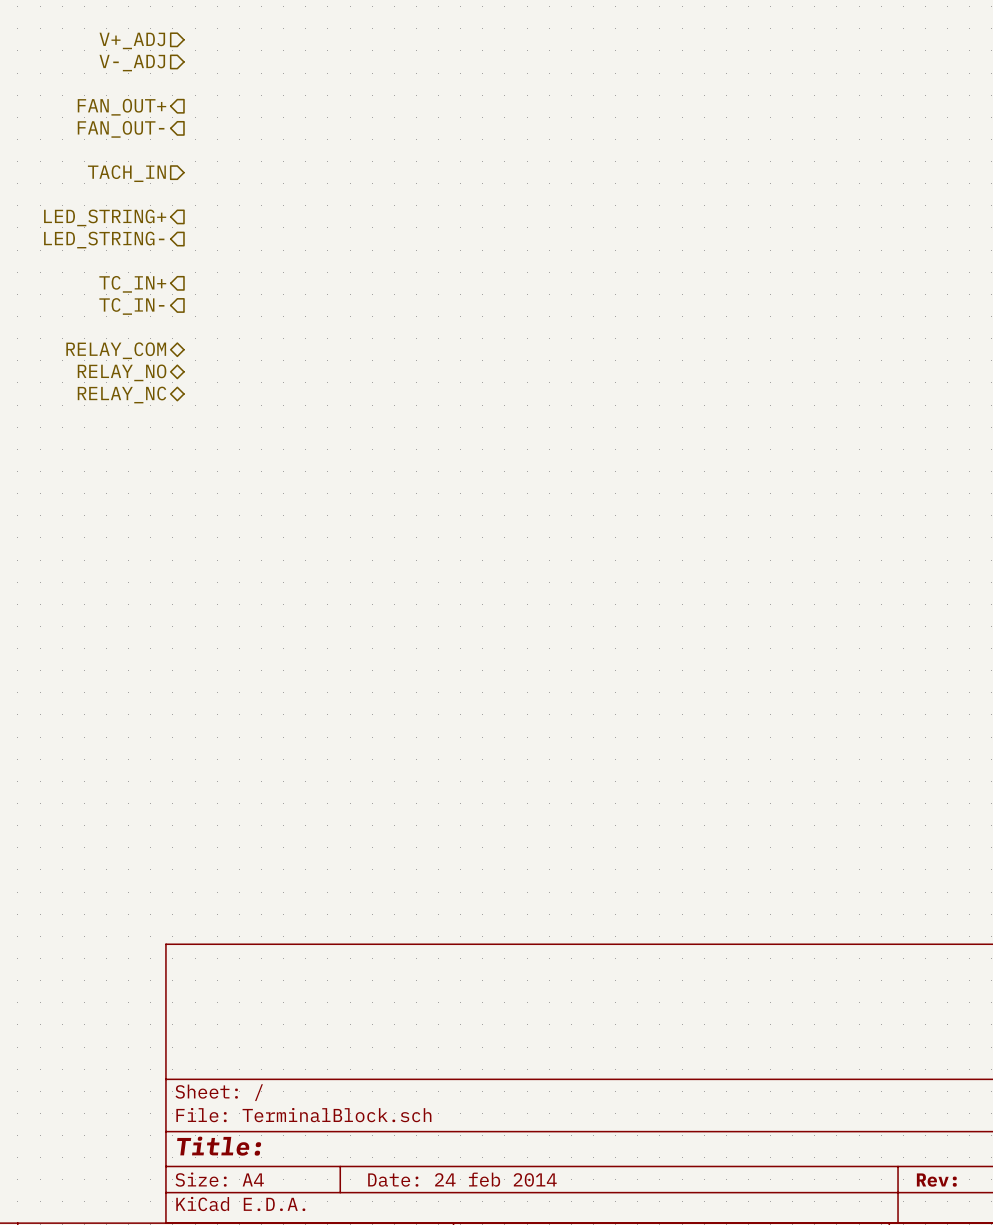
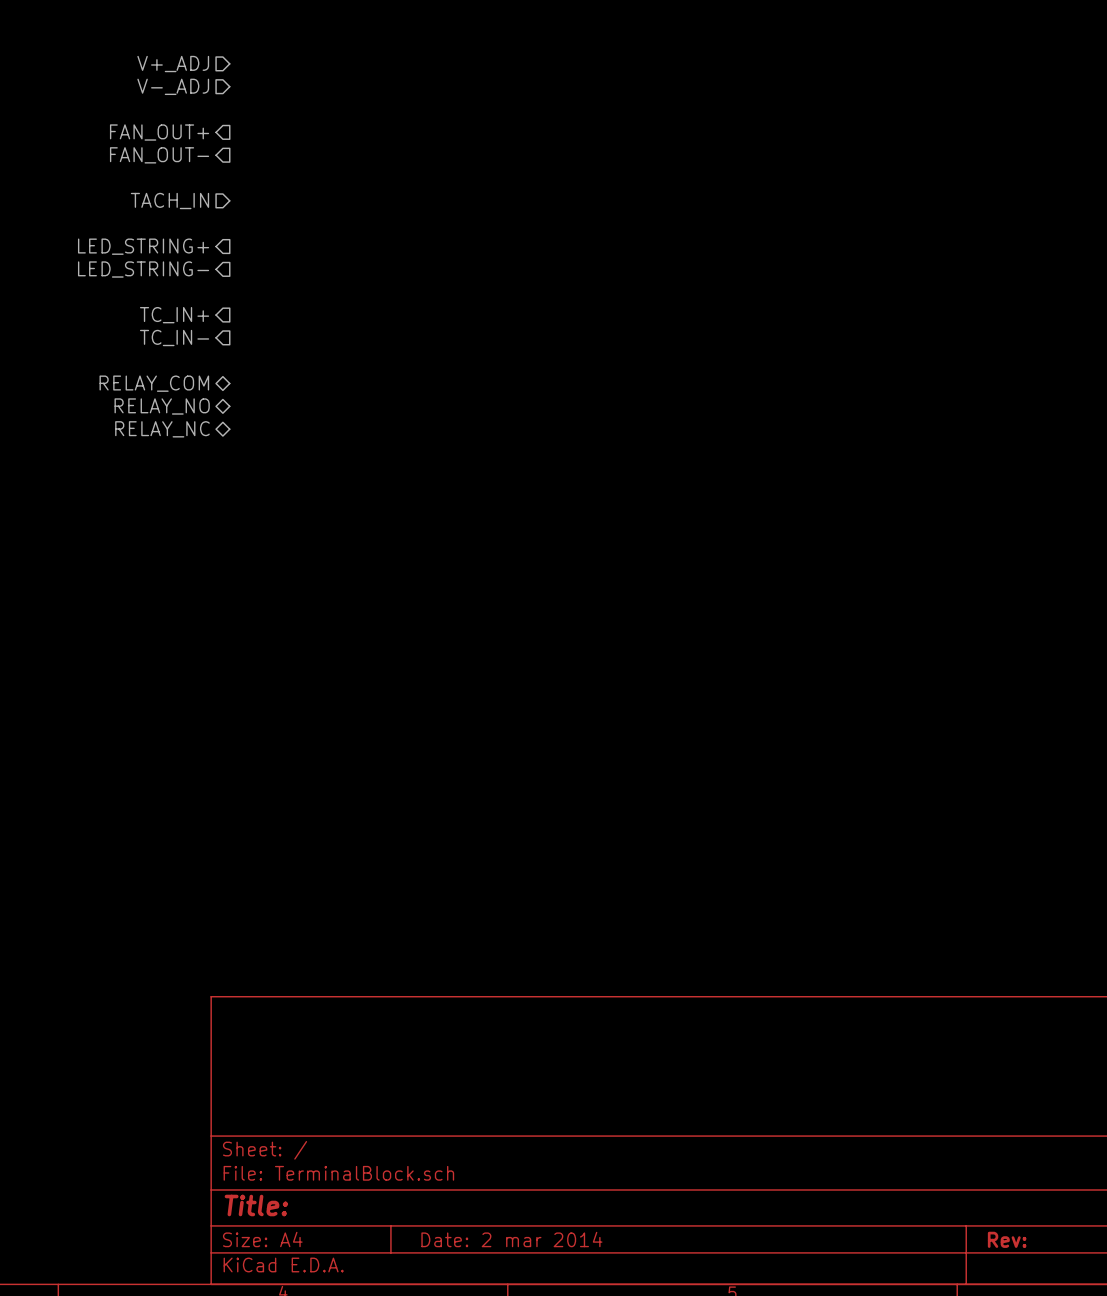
title block: Date: 24 feb 2014 (462, 1179) -> Date: 2 mar 2014 (511, 1239)

